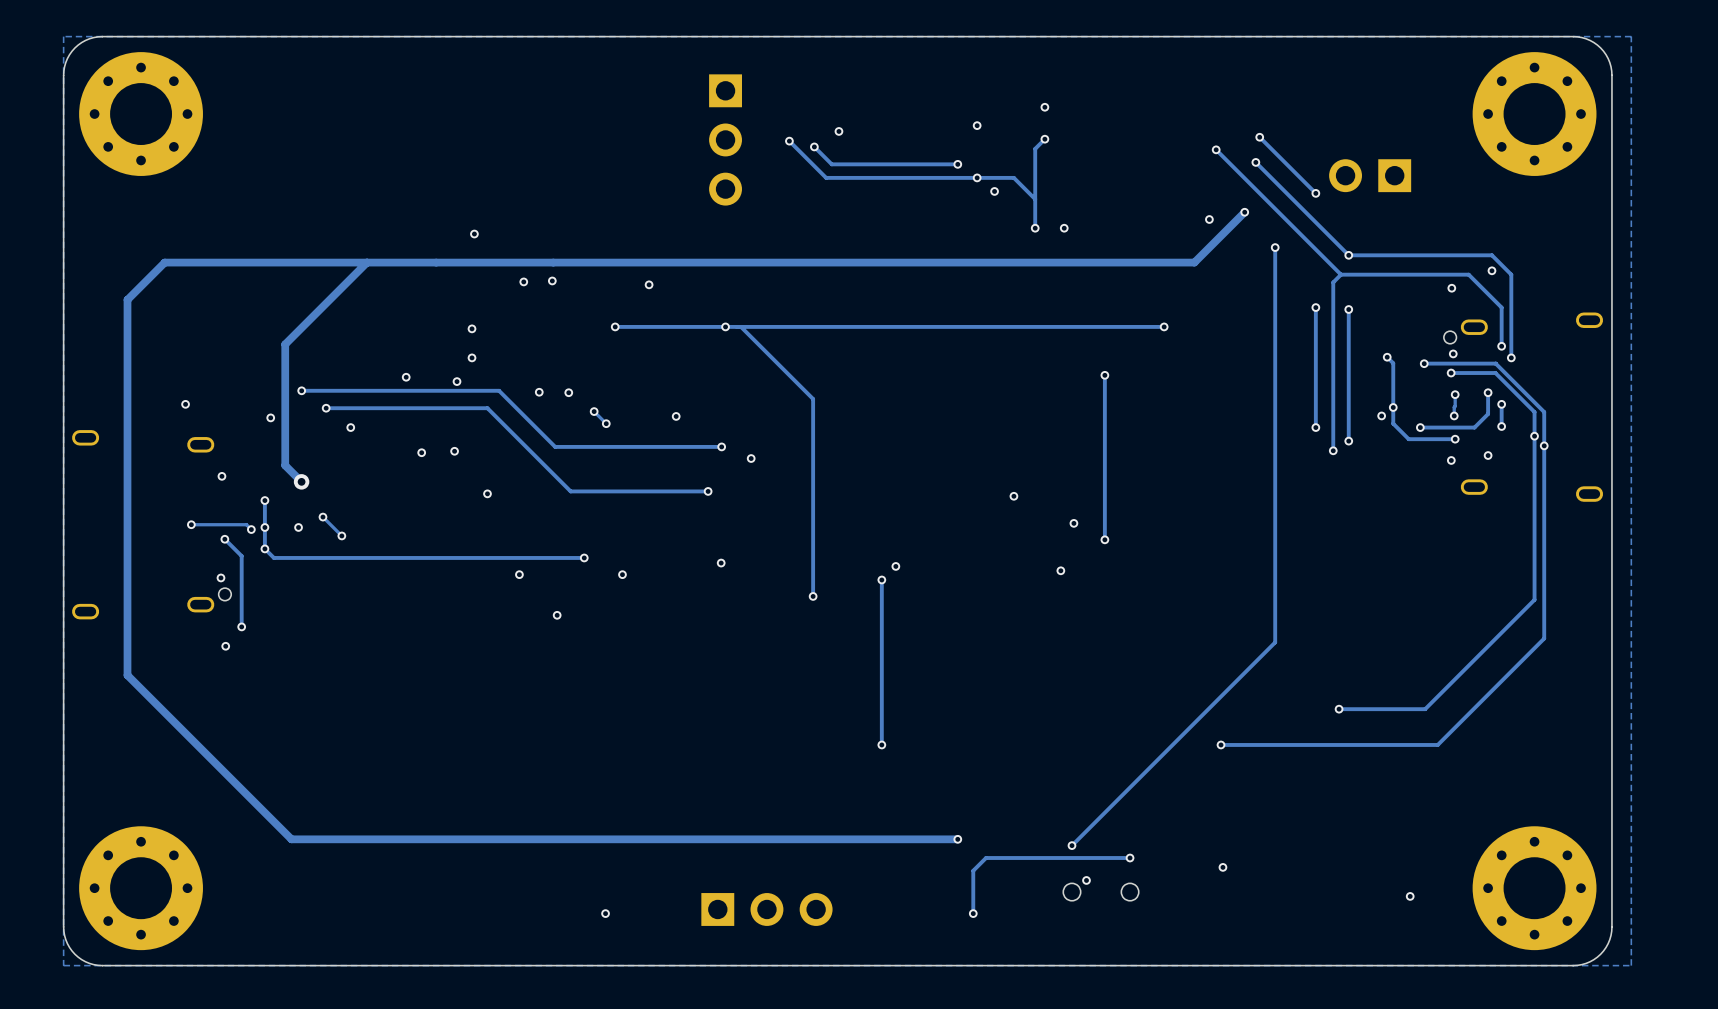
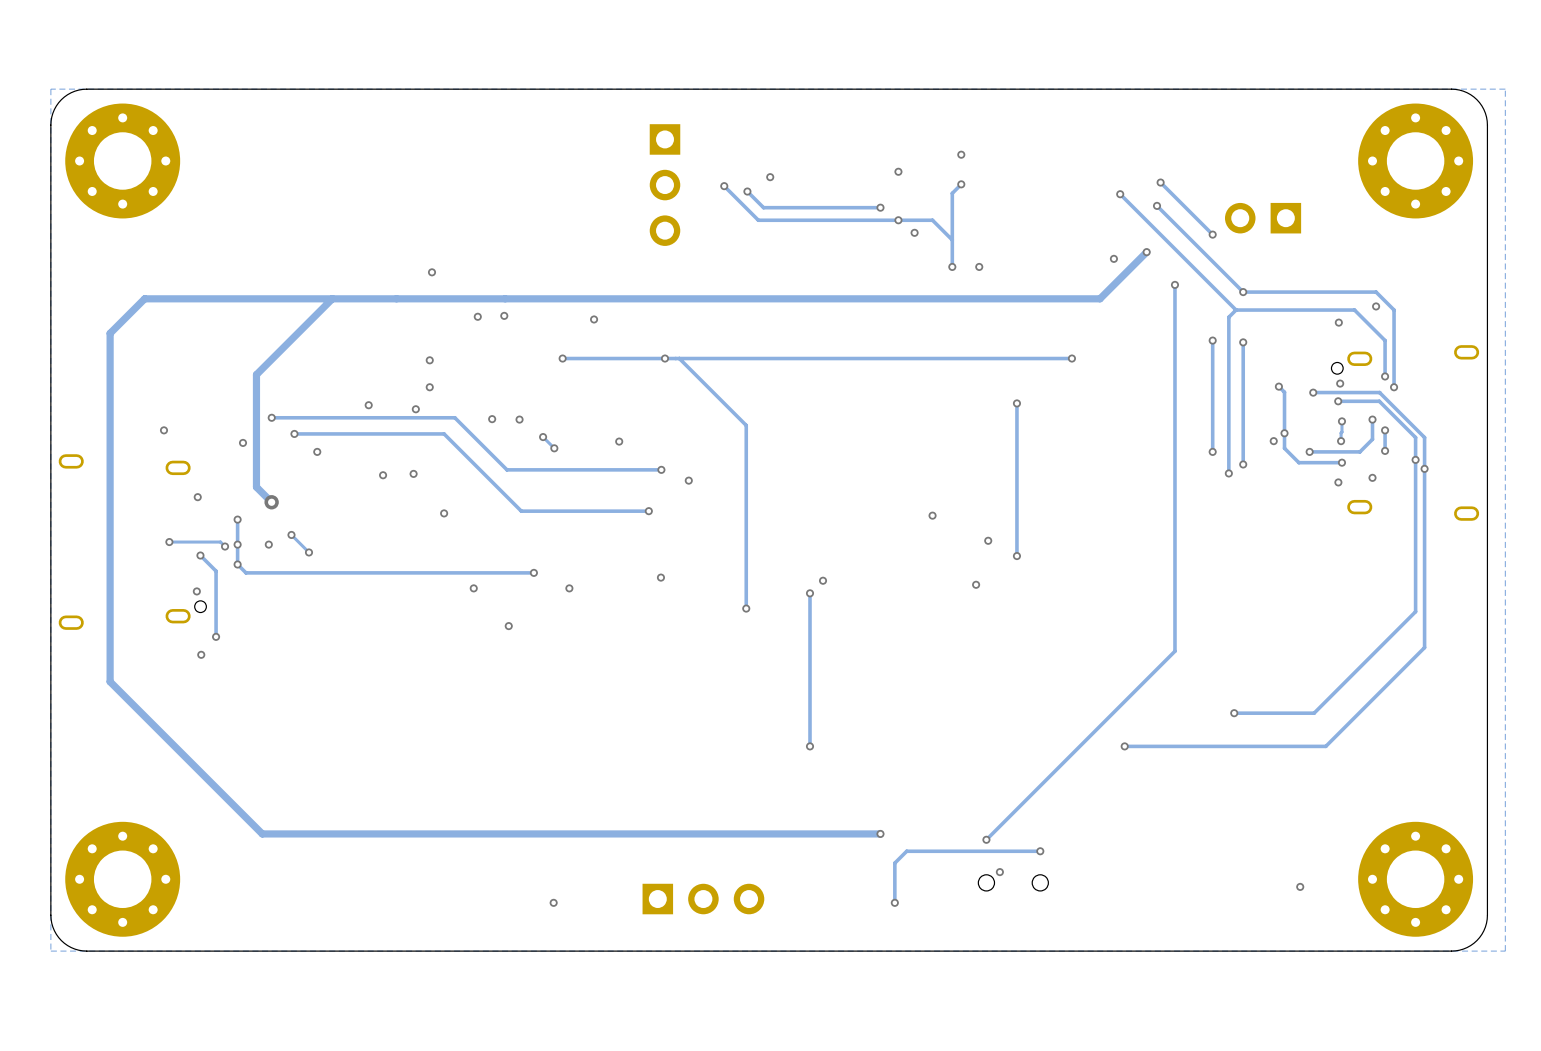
via: (1222, 867) -> none

